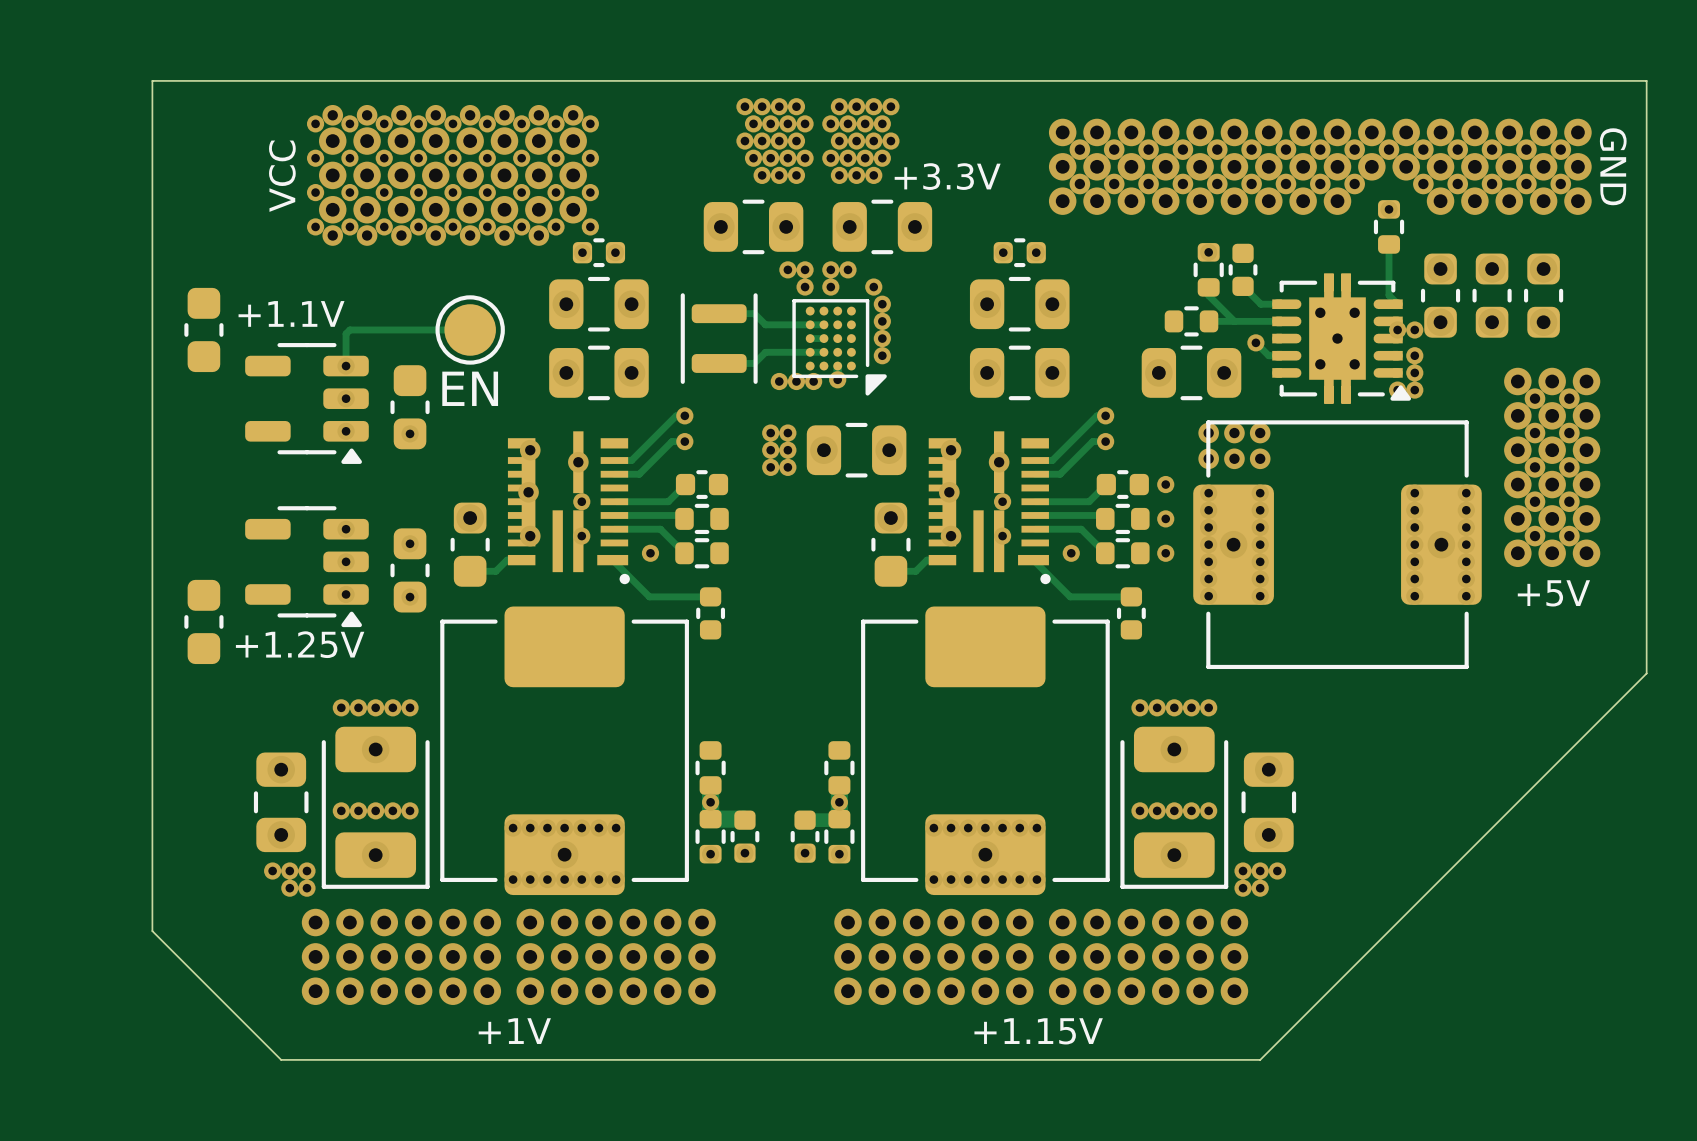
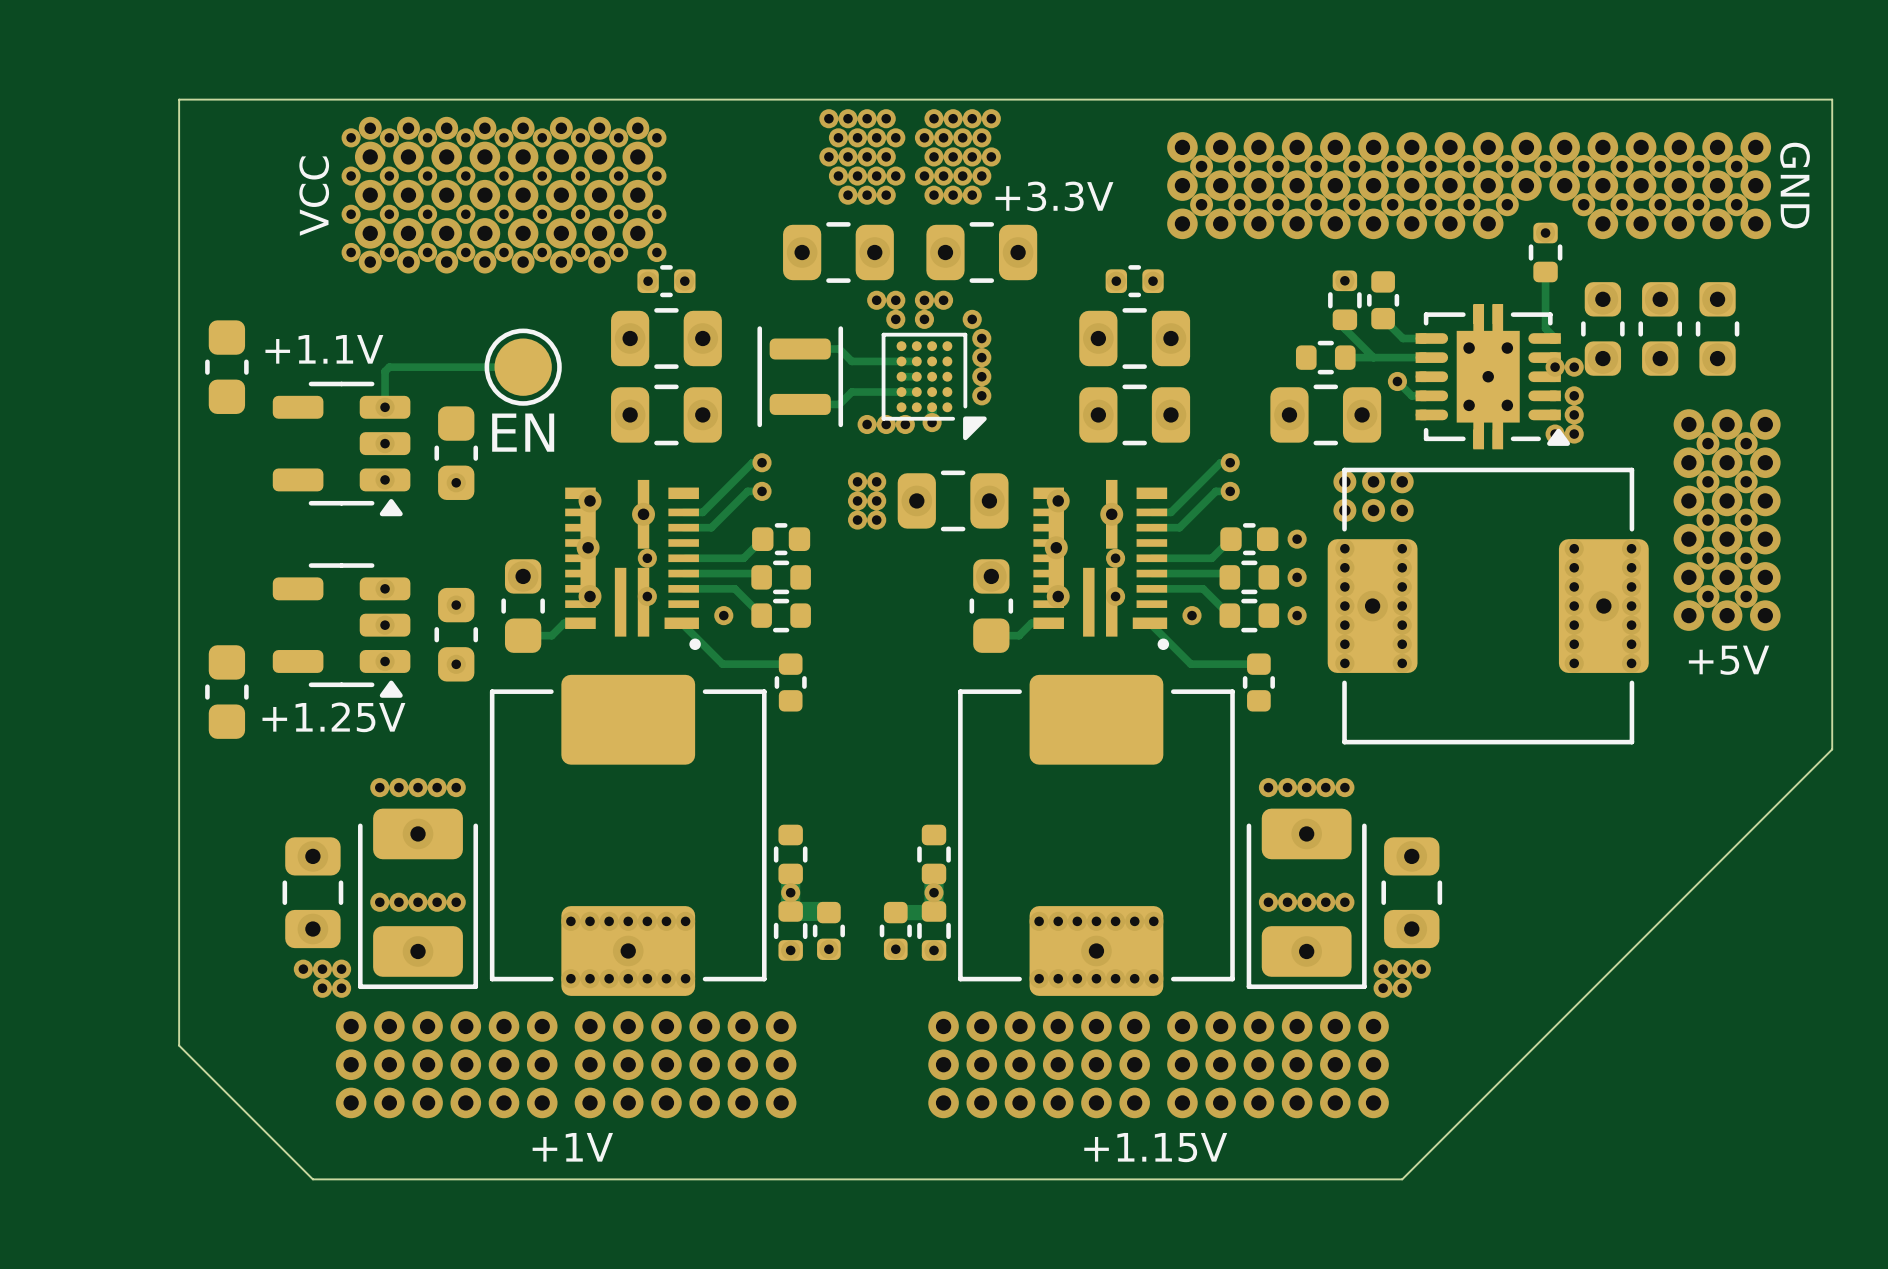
board edge: (1646, 89) (1646, 80) (152, 80) (152, 931) (160, 939) -> (1832, 99) (179, 99) (179, 1045)

